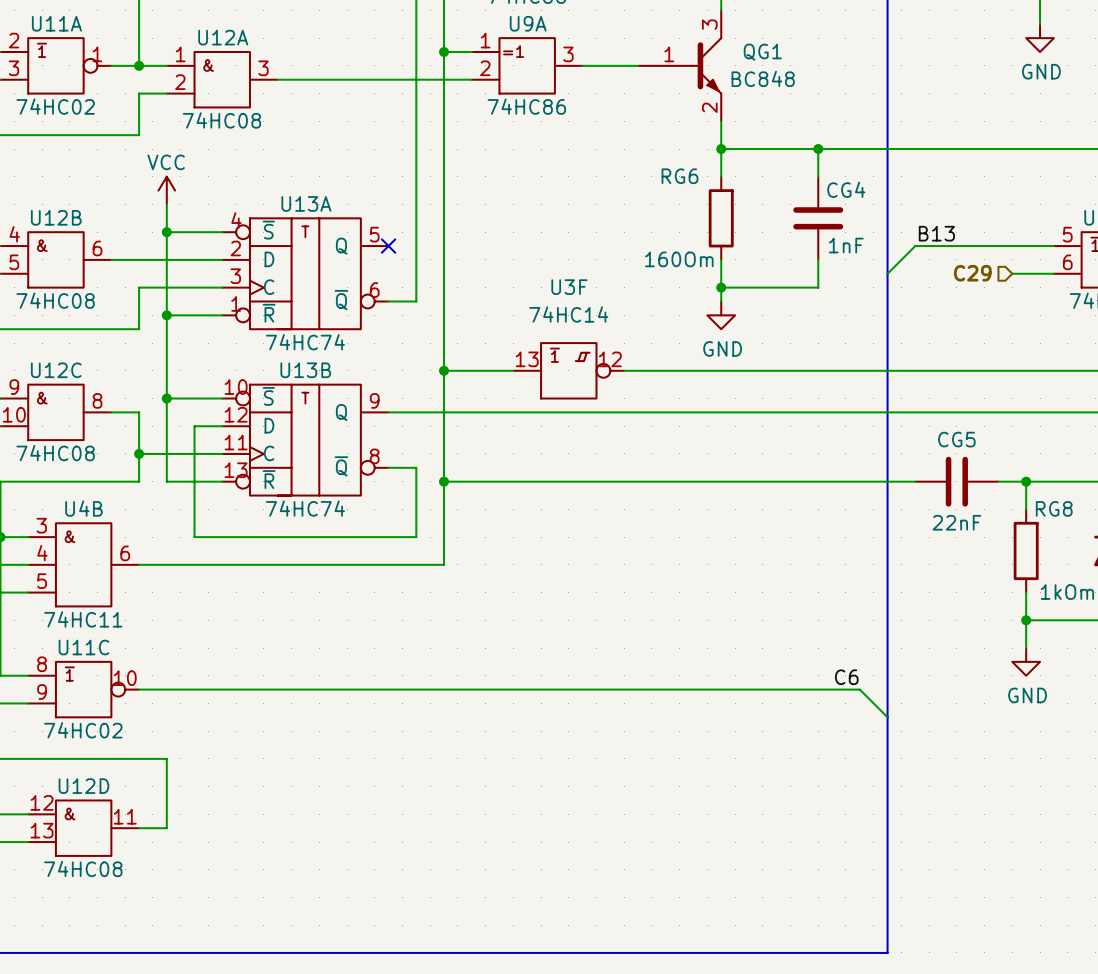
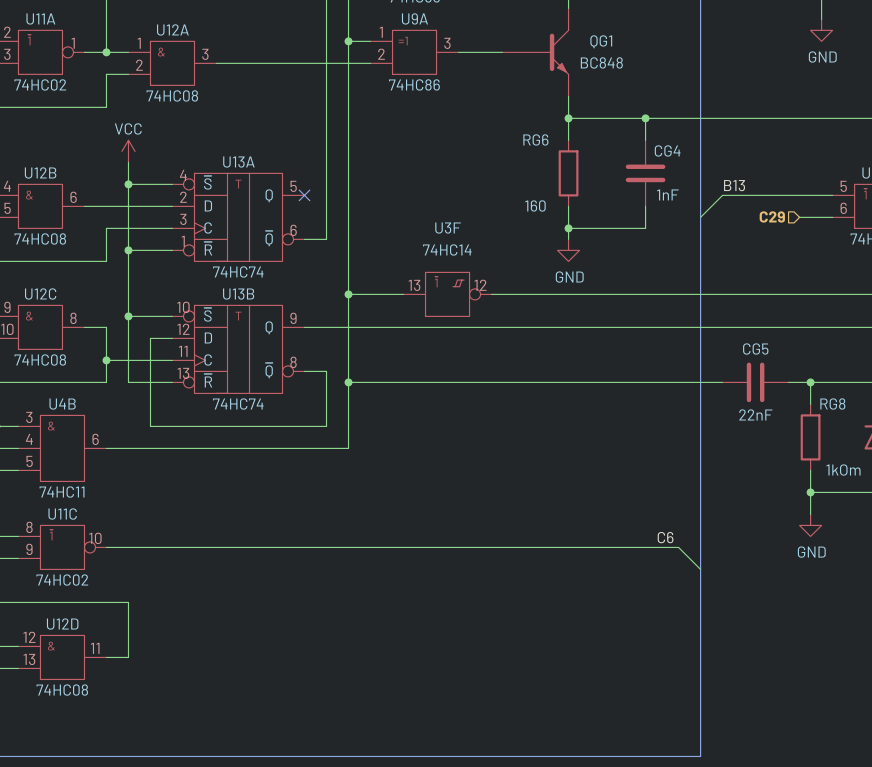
QG1 pin number: 3 (709, 24) -> none
QG1 pin number: 1 (669, 54) -> none
QG1 pin number: 2 (709, 107) -> none
RG6 value: 160Om (679, 259) -> 160 (535, 205)

